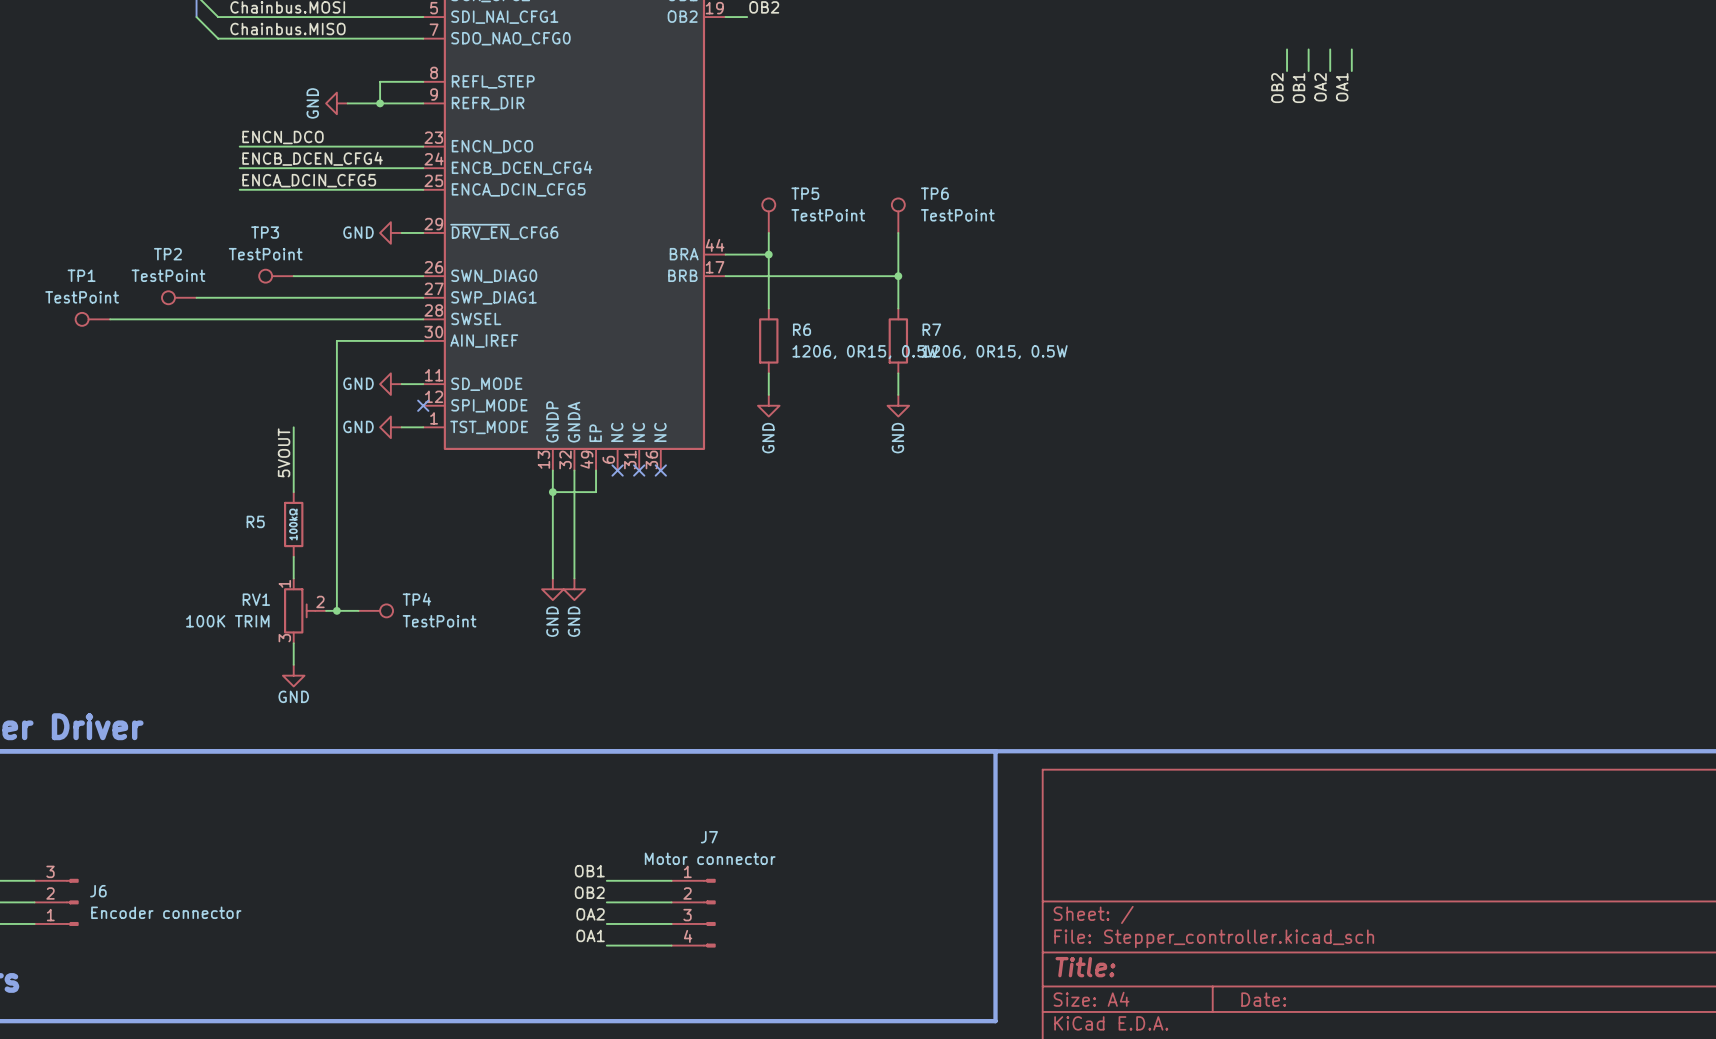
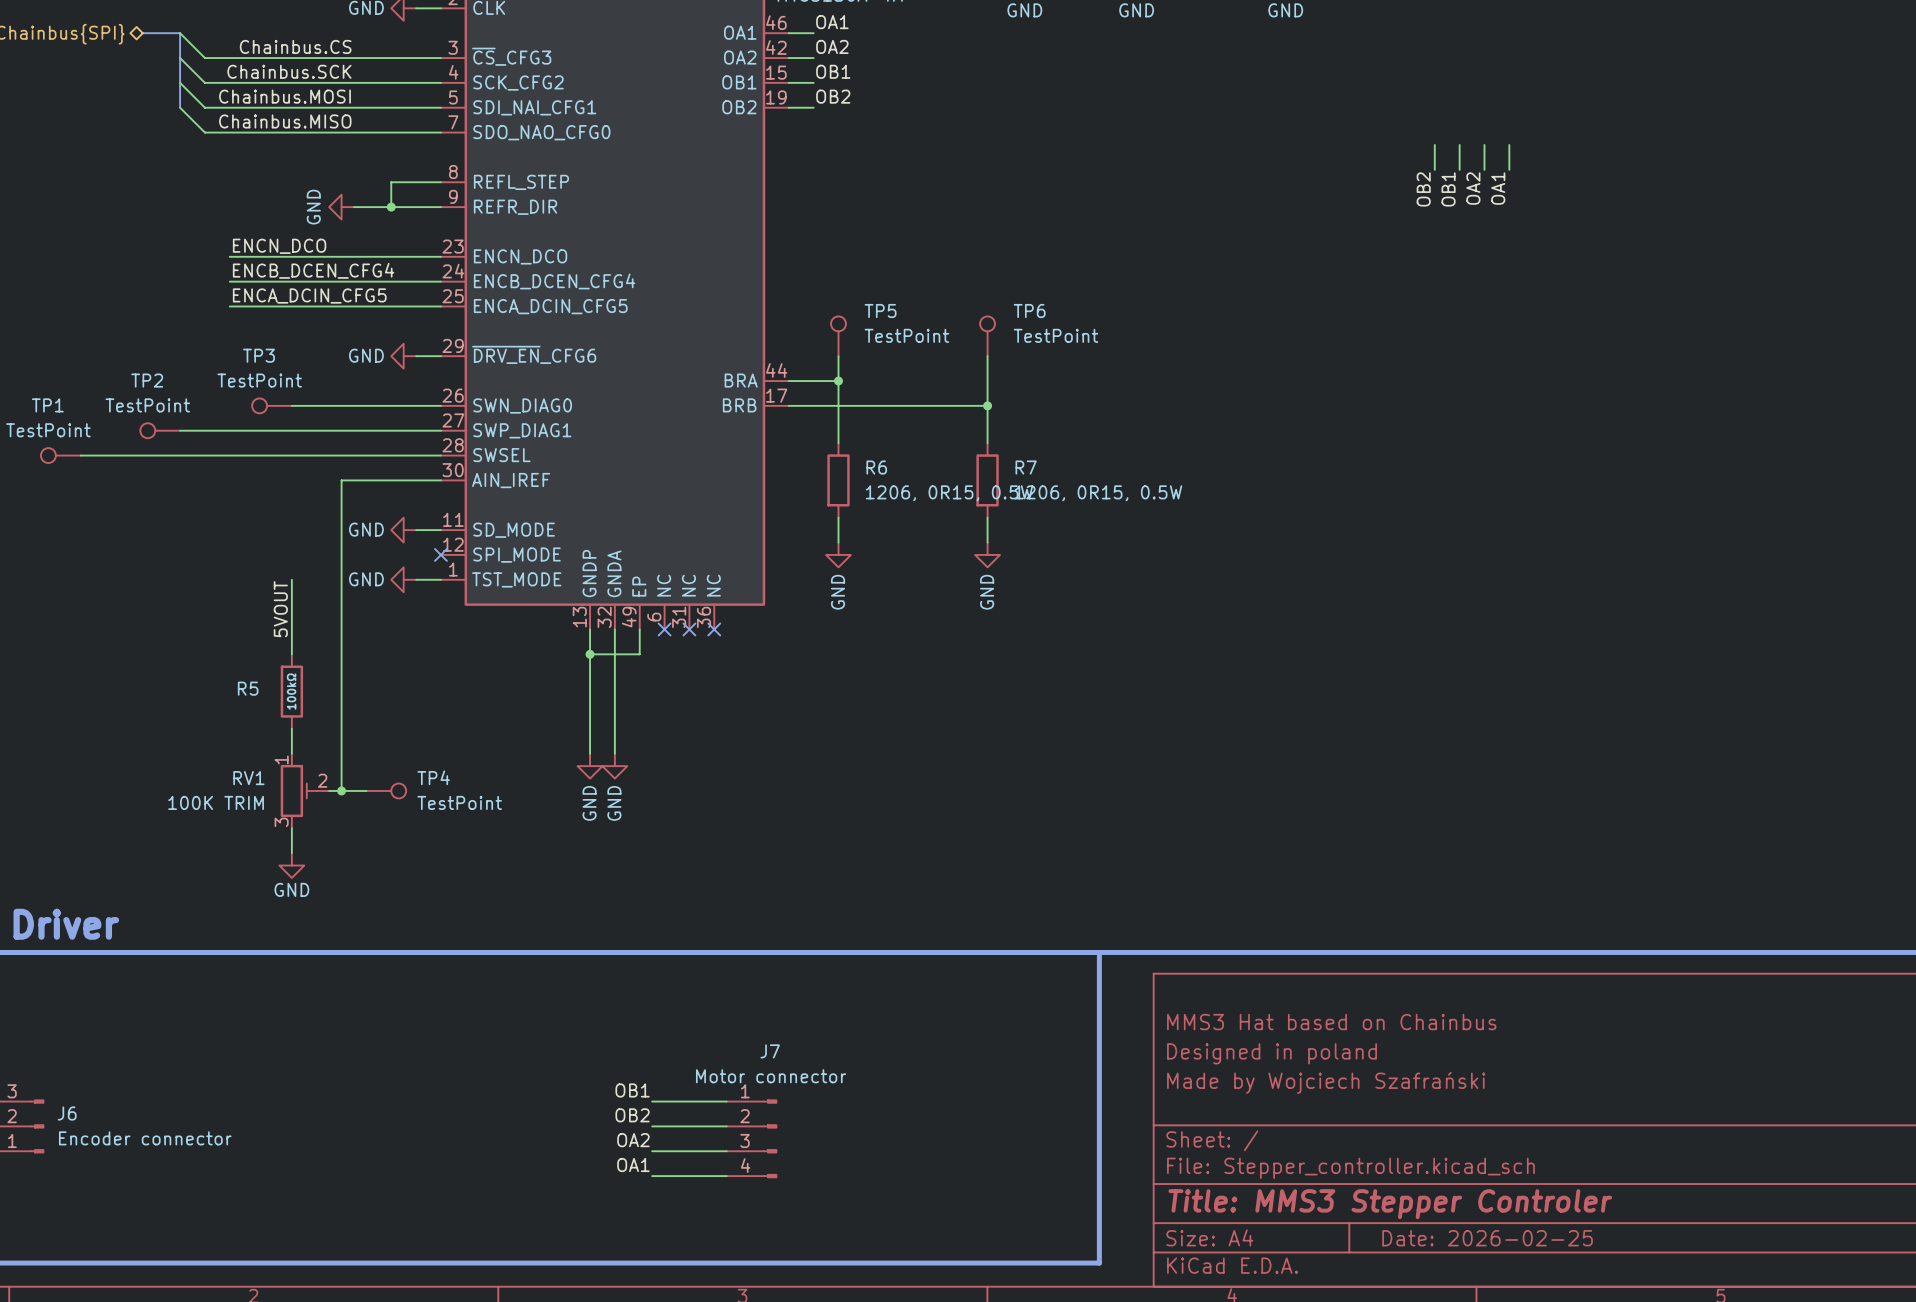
title block: none -> MMS3 Hat based on Chainbus (1331, 1022)
title block: none -> Designed in poland (1272, 1053)
title block: none -> Made by Wojciech Szafrański (1326, 1082)
title block: Title: (1085, 967) -> Title: MMS3 Stepper Controler (1390, 1204)
title block: Date: (1263, 999) -> Date: 2026-02-25 (1487, 1238)

